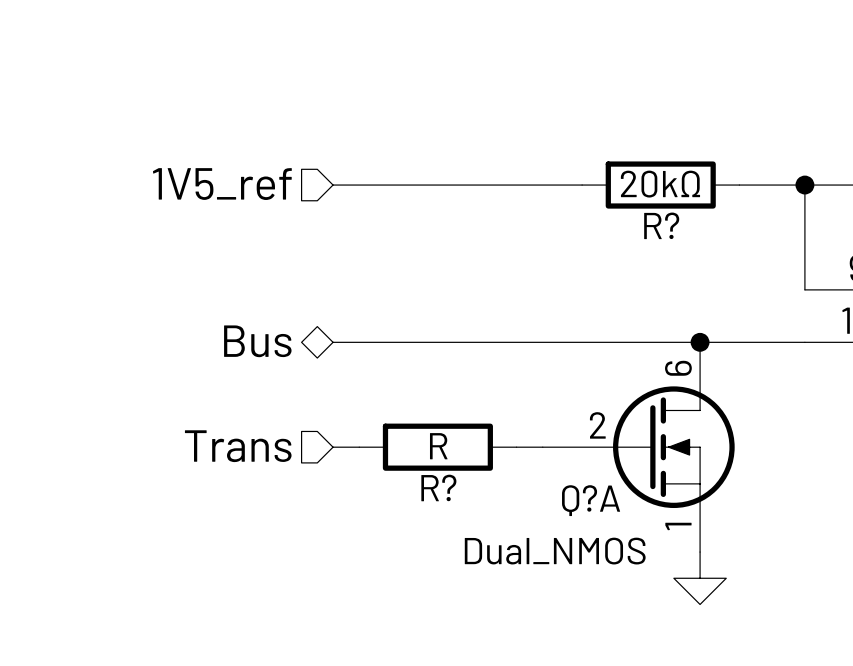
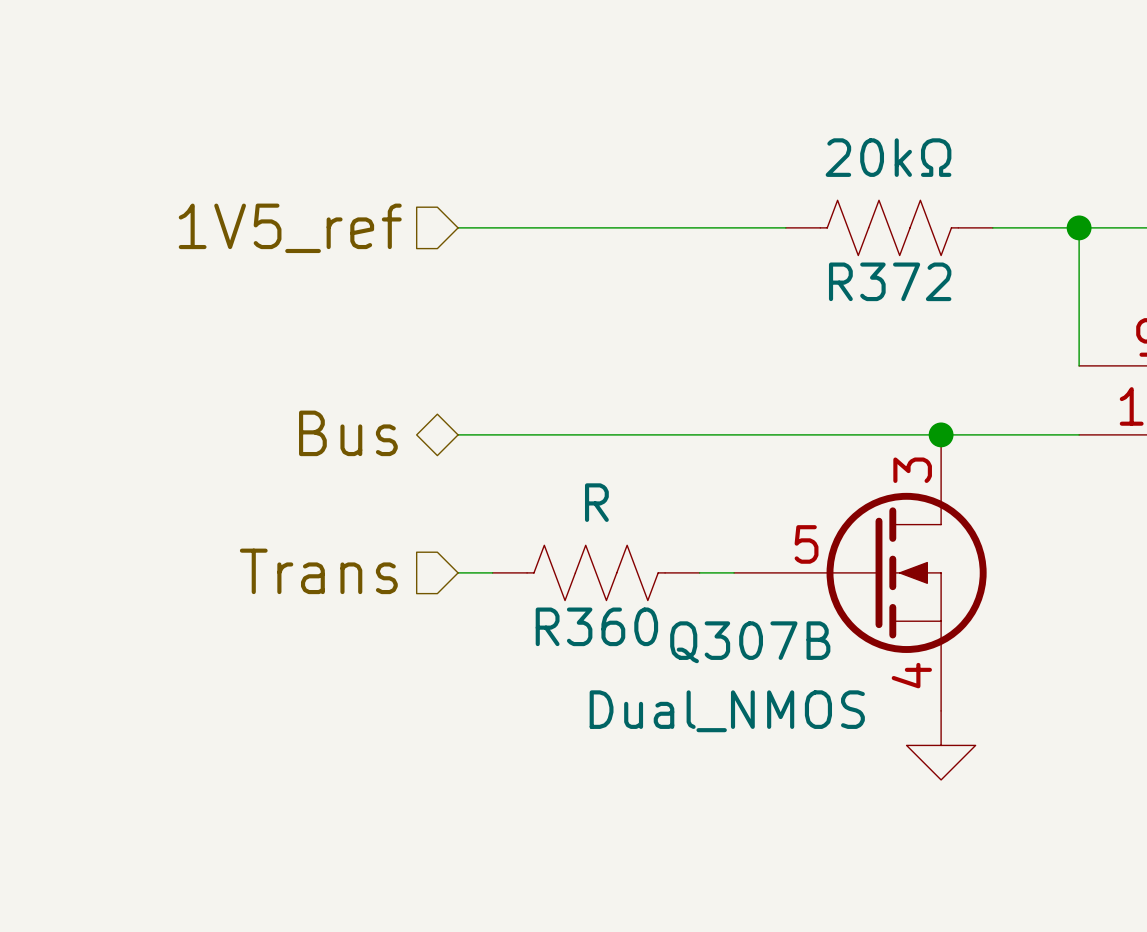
R?: 20kΩ (660, 185) -> none
R372: none -> 20kΩ (889, 227)
Q?A pin number: 6 (678, 368) -> 3 (912, 470)
Q?A pin number: 2 (597, 425) -> 5 (806, 544)
R?: R (437, 447) -> none
R360: none -> R (596, 572)
Q?A name: Q?A (591, 500) -> Q307B (750, 642)
Q?A pin number: 1 (678, 526) -> 4 (911, 675)

